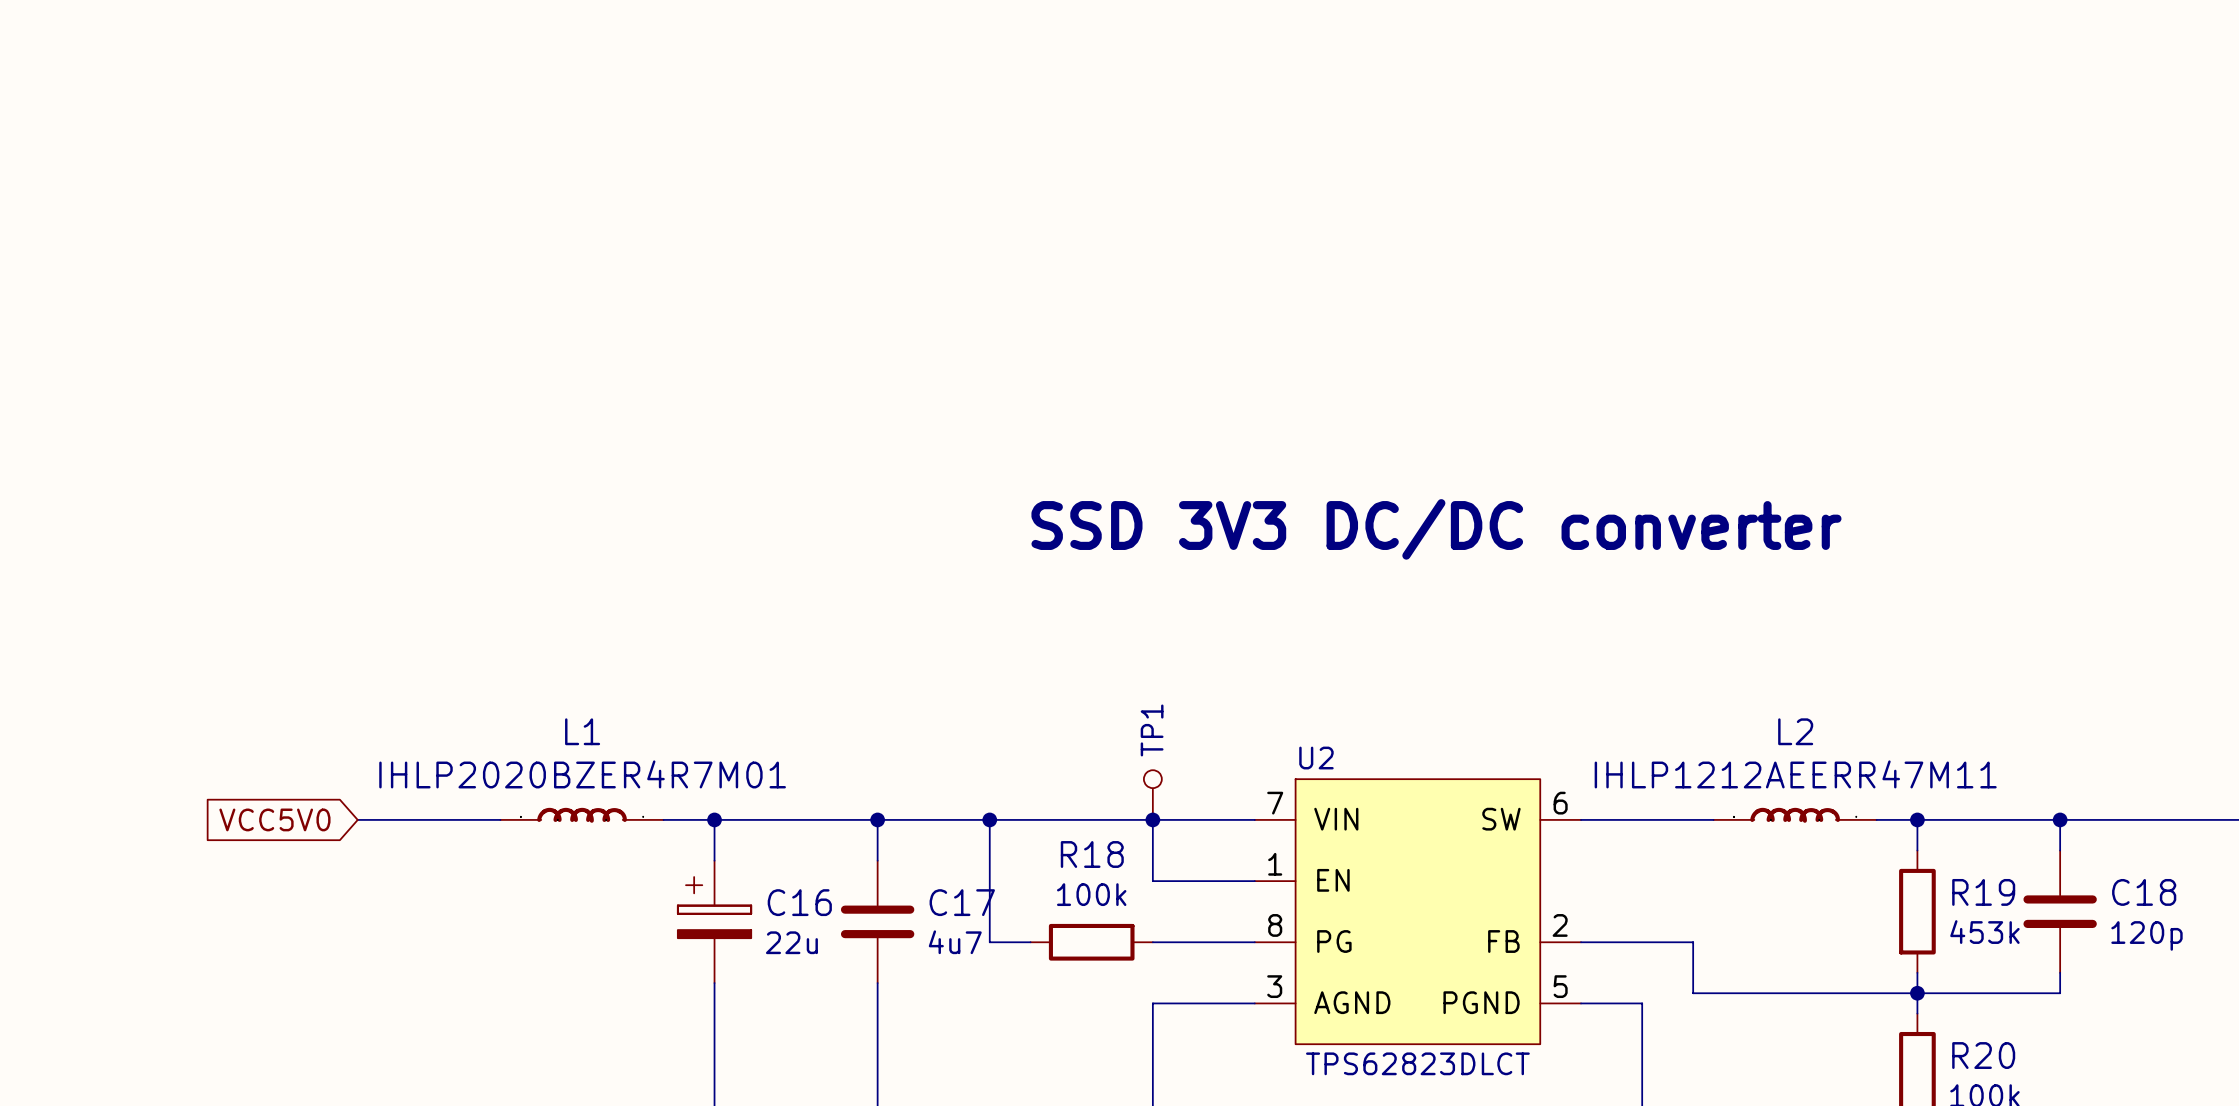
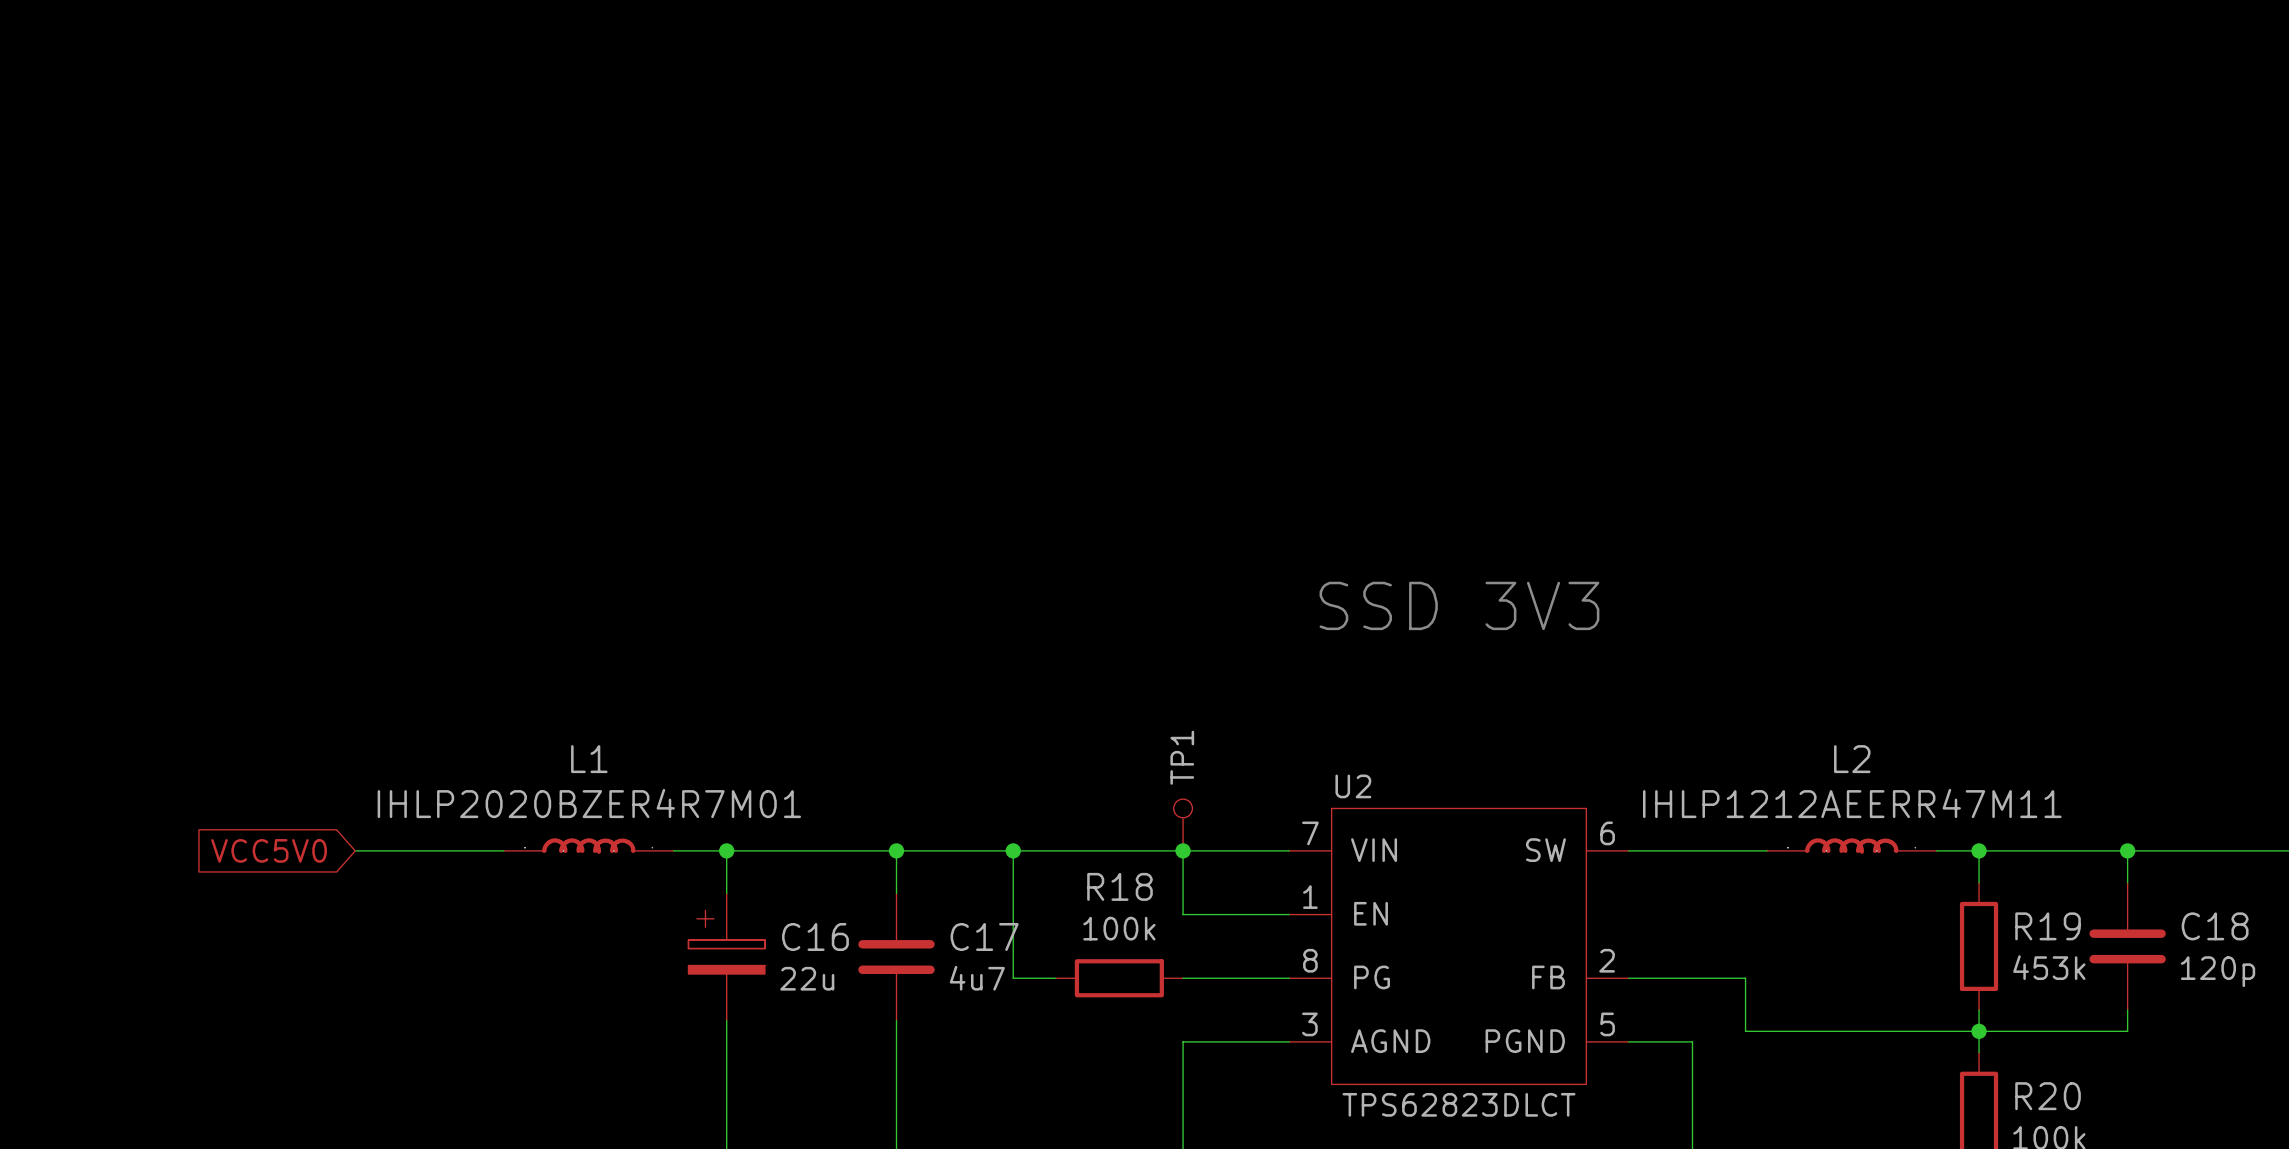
text: SSD 3V3 DC/DC converter (1436, 529) -> none
text: none -> SSD 3V3 (1459, 605)

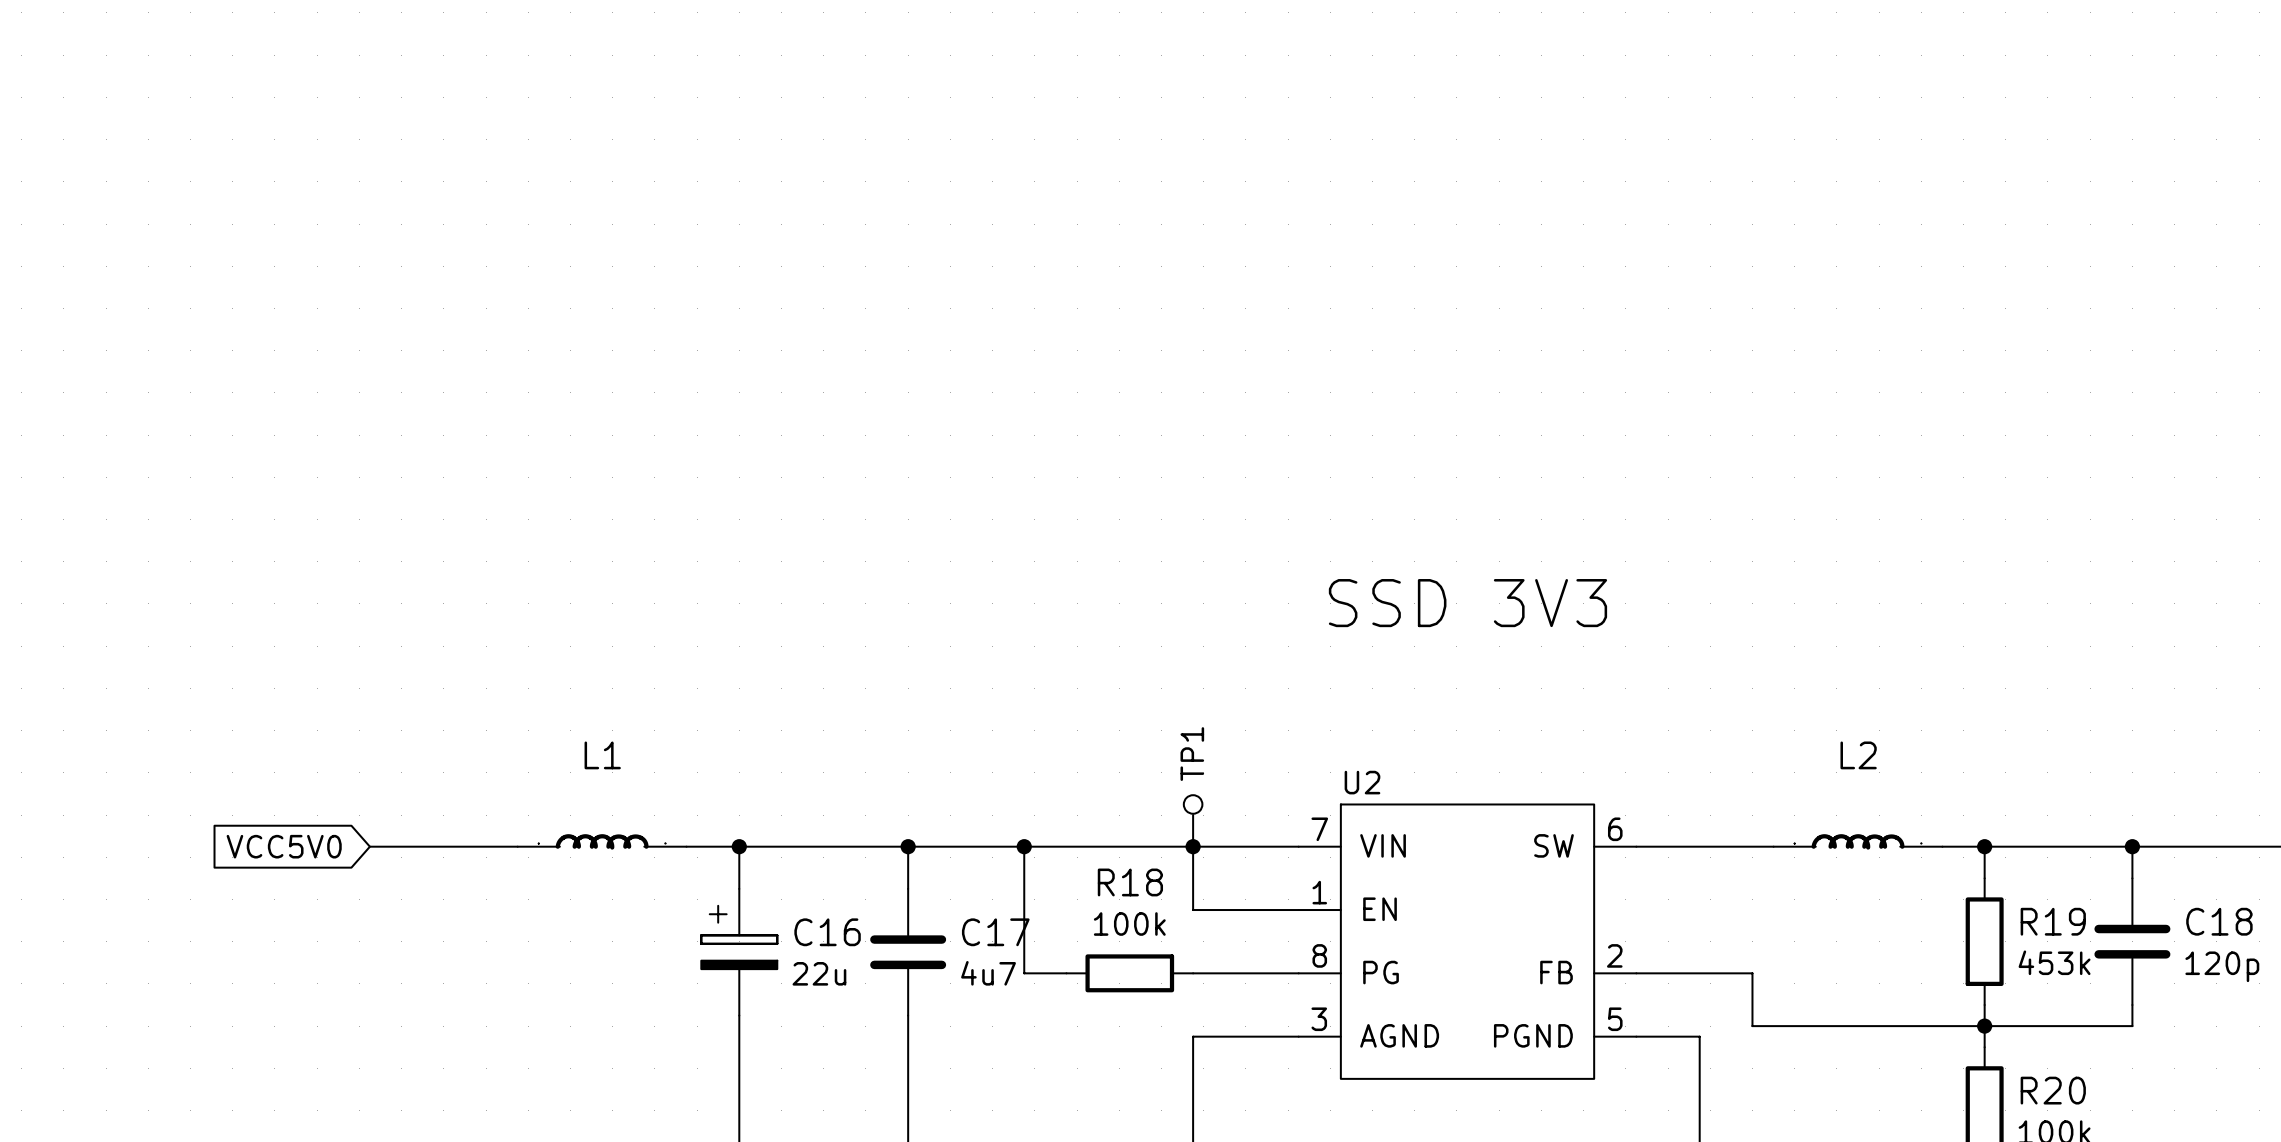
L1 value: IHLP2020BZER4R7M01 (589, 803) -> none
L2 value: IHLP1212AEERR47M11 (1852, 803) -> none
U2 value: TPS62823DLCT (1459, 1104) -> none

